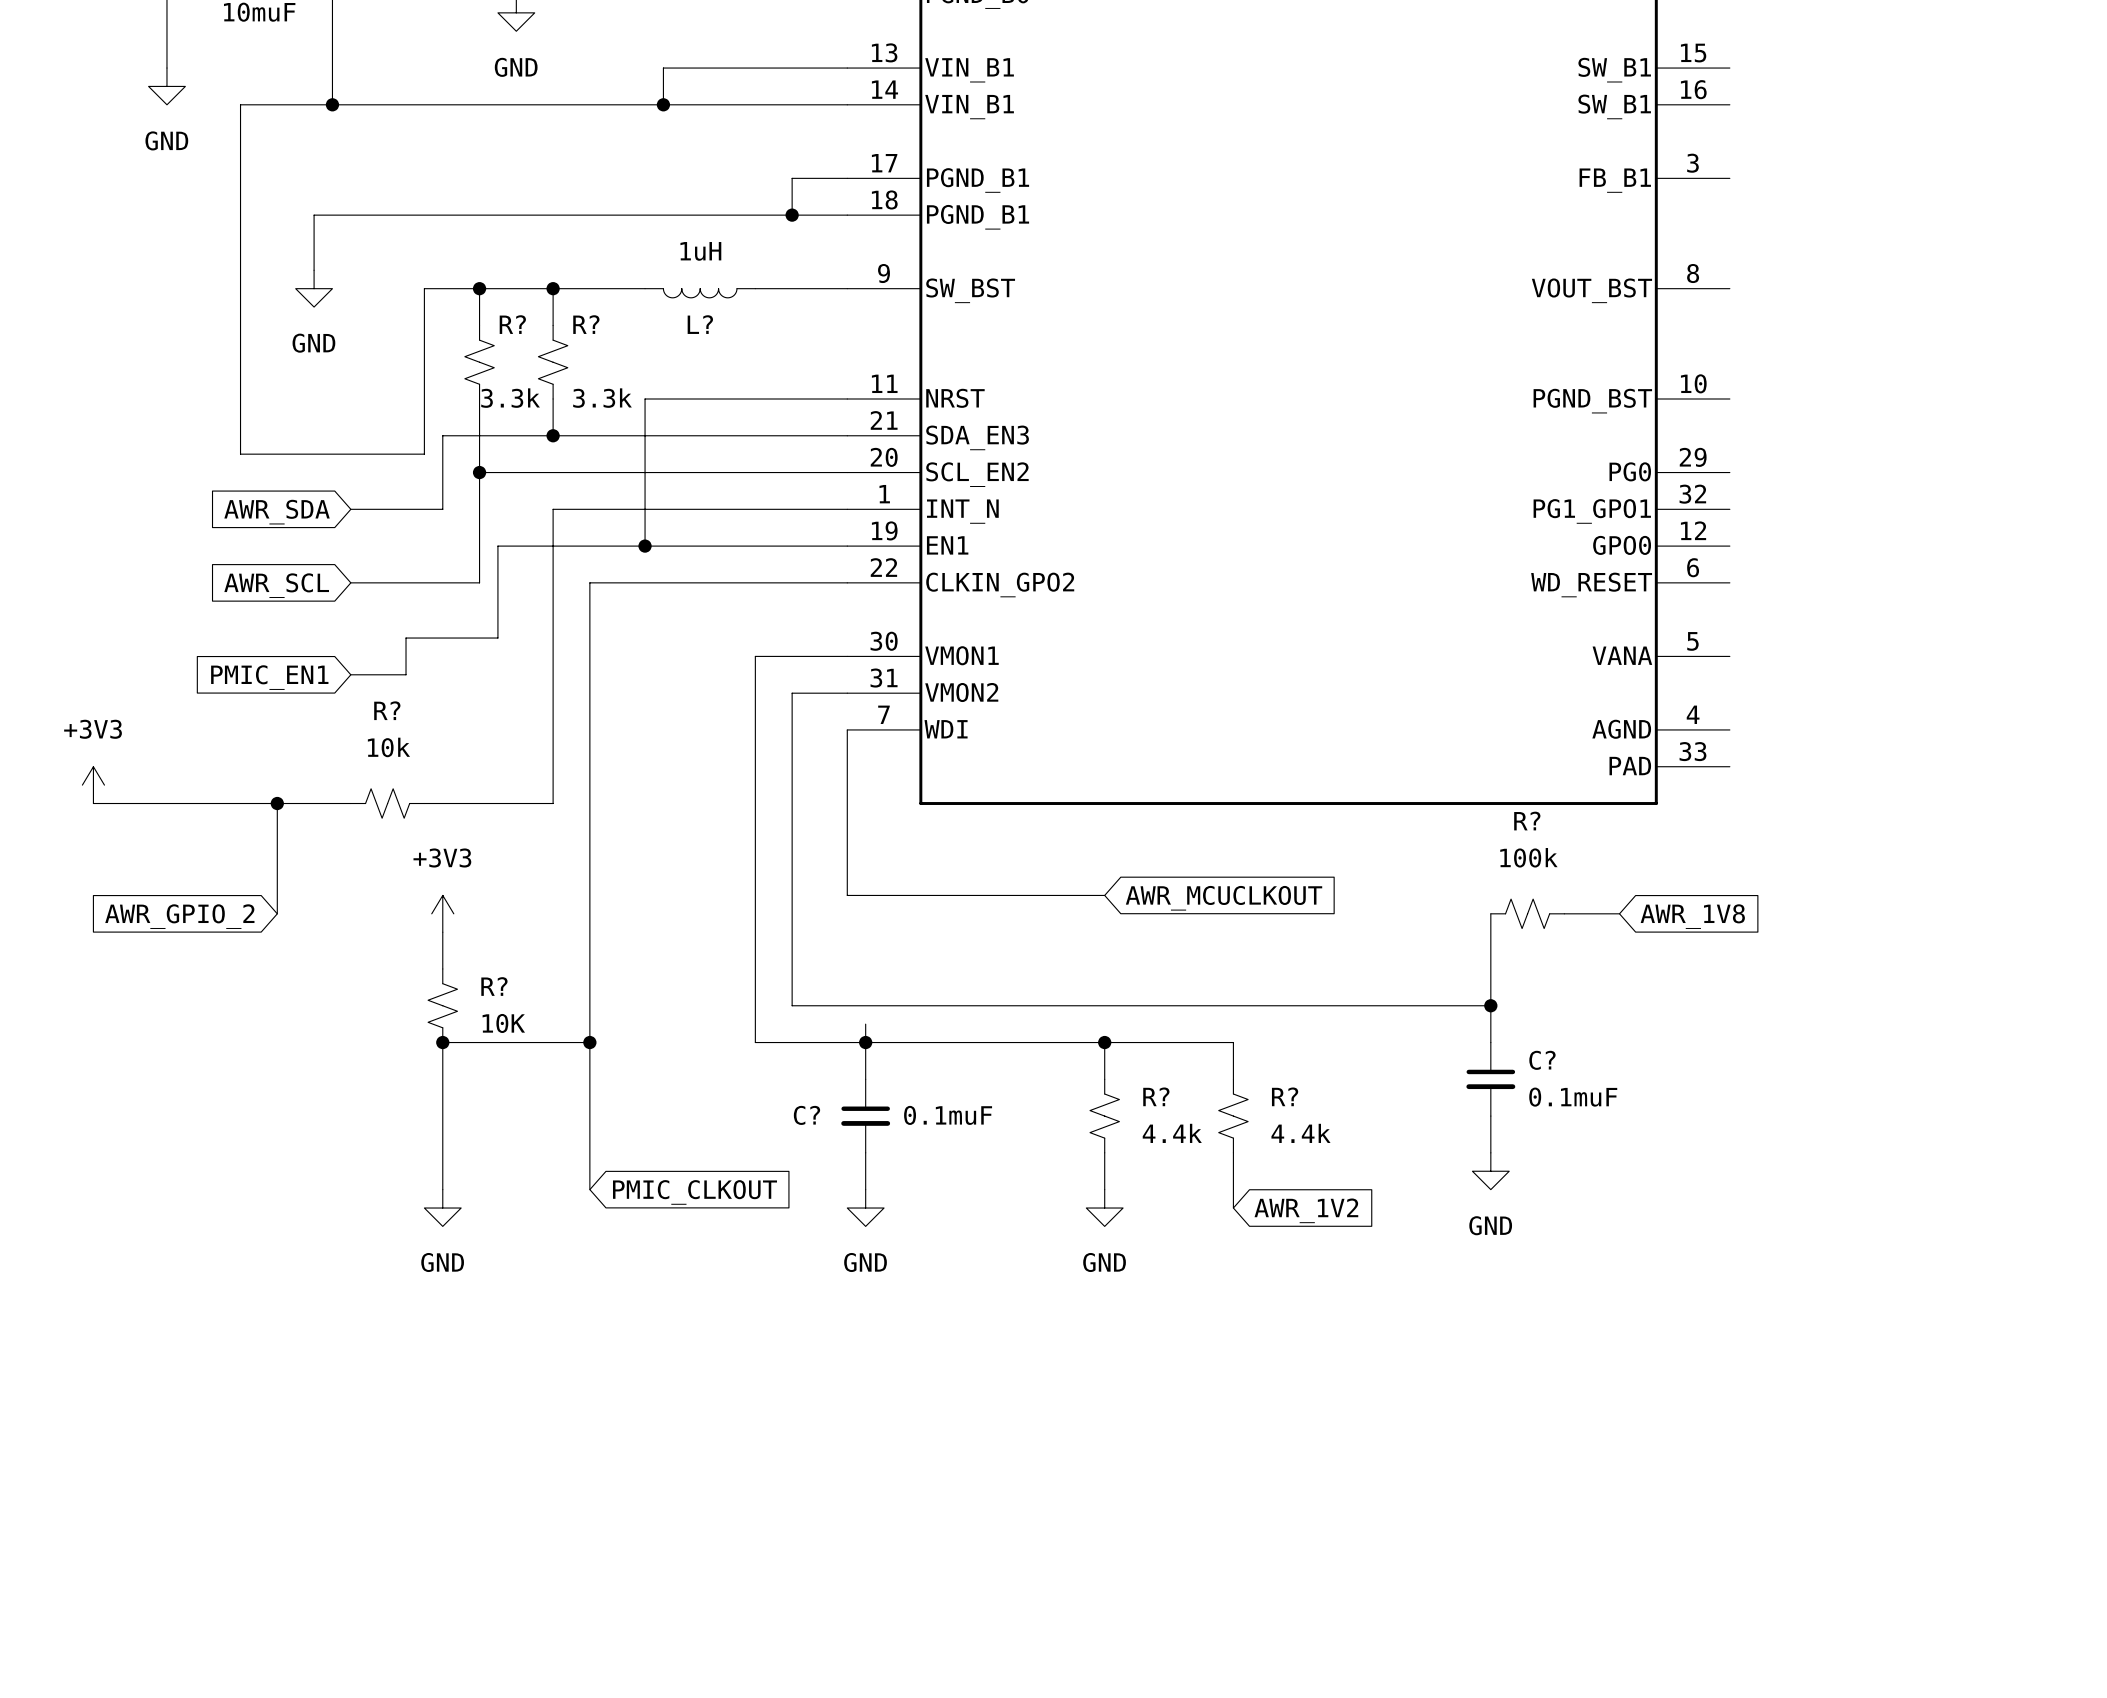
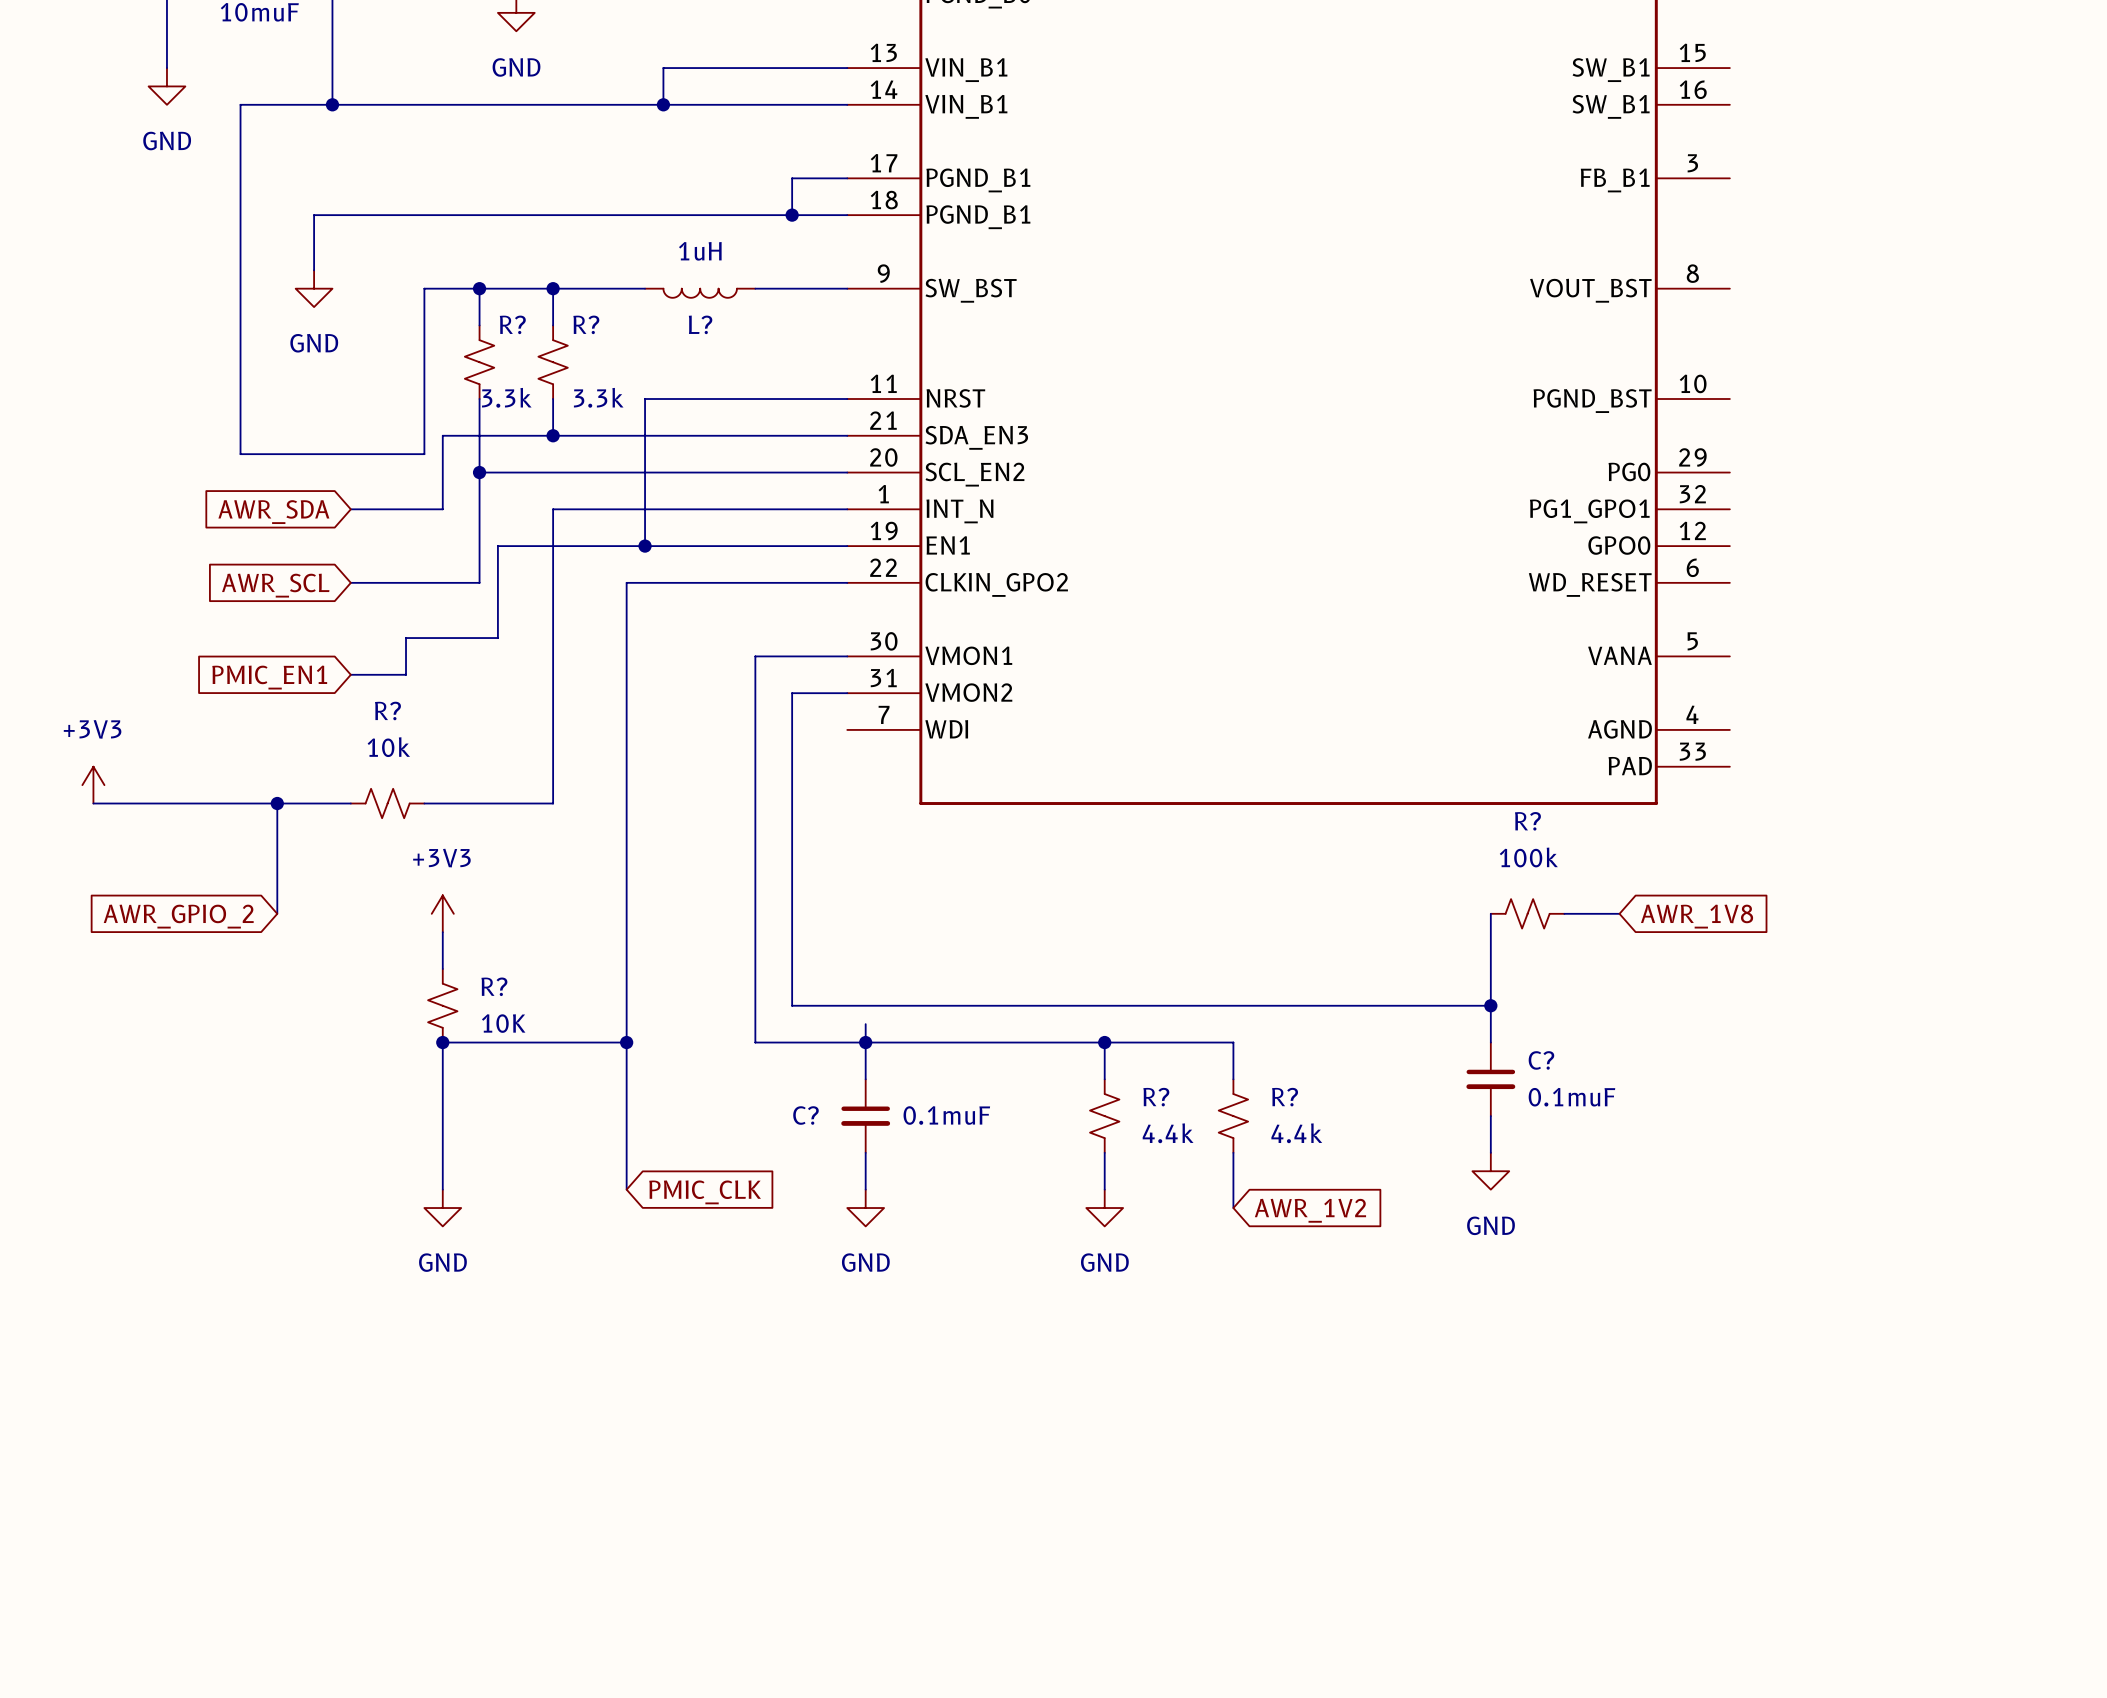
wire: (626, 582) (589, 582) (589, 1189) -> (626, 582) (626, 1189)
wire: (847, 729) (847, 895) (1104, 895) -> none
global label: AWR_MCUCLKOUT (1224, 898) -> none
wire: none -> (589, 1042) (626, 1042)
junction position: (589, 1042) -> (626, 1042)
global label: PMIC_CLKOUT (694, 1192) -> PMIC_CLK (705, 1192)

